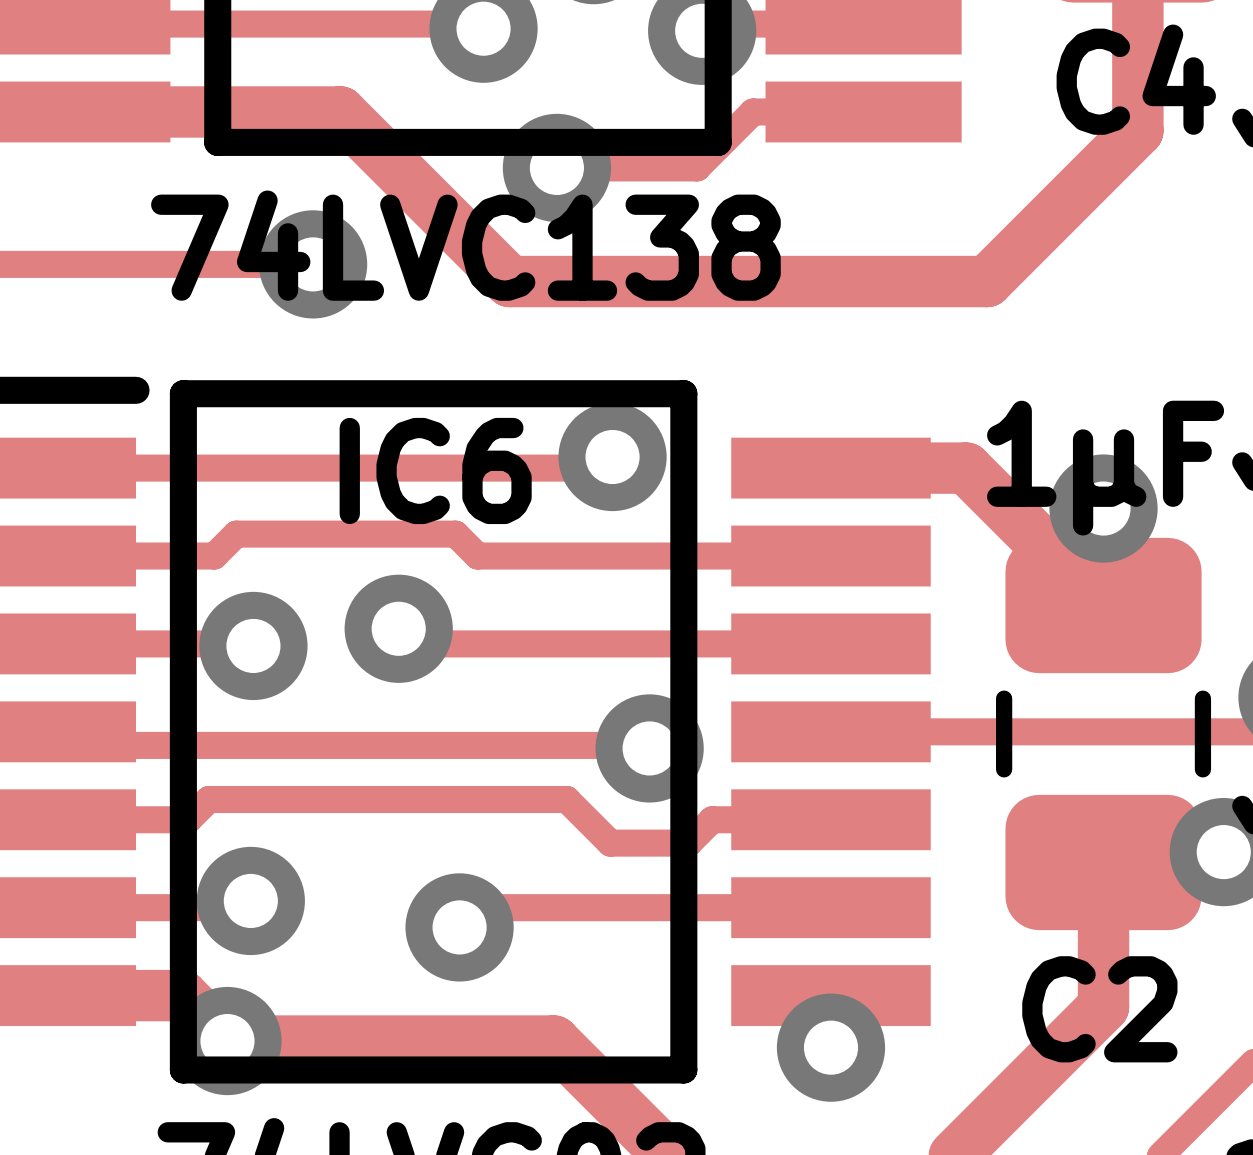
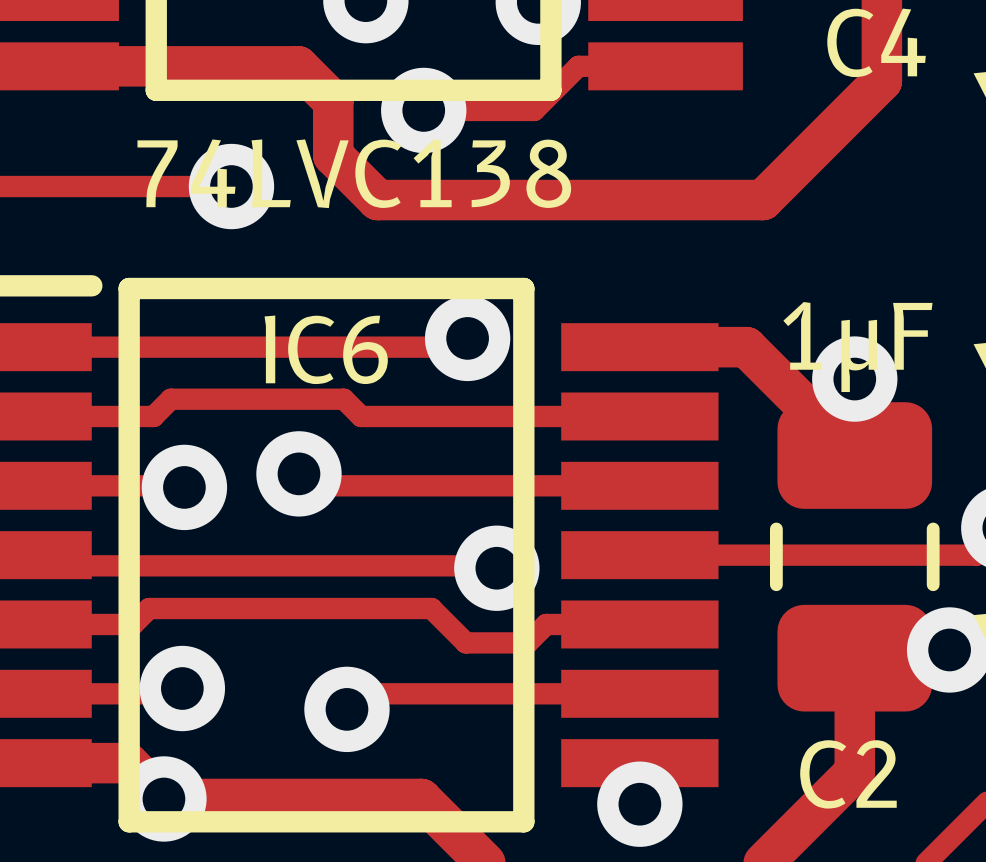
track: (340, 111) (509, 281) -> (252, 66) (298, 66) (333, 101) (333, 155) (377, 200) (386, 200)

